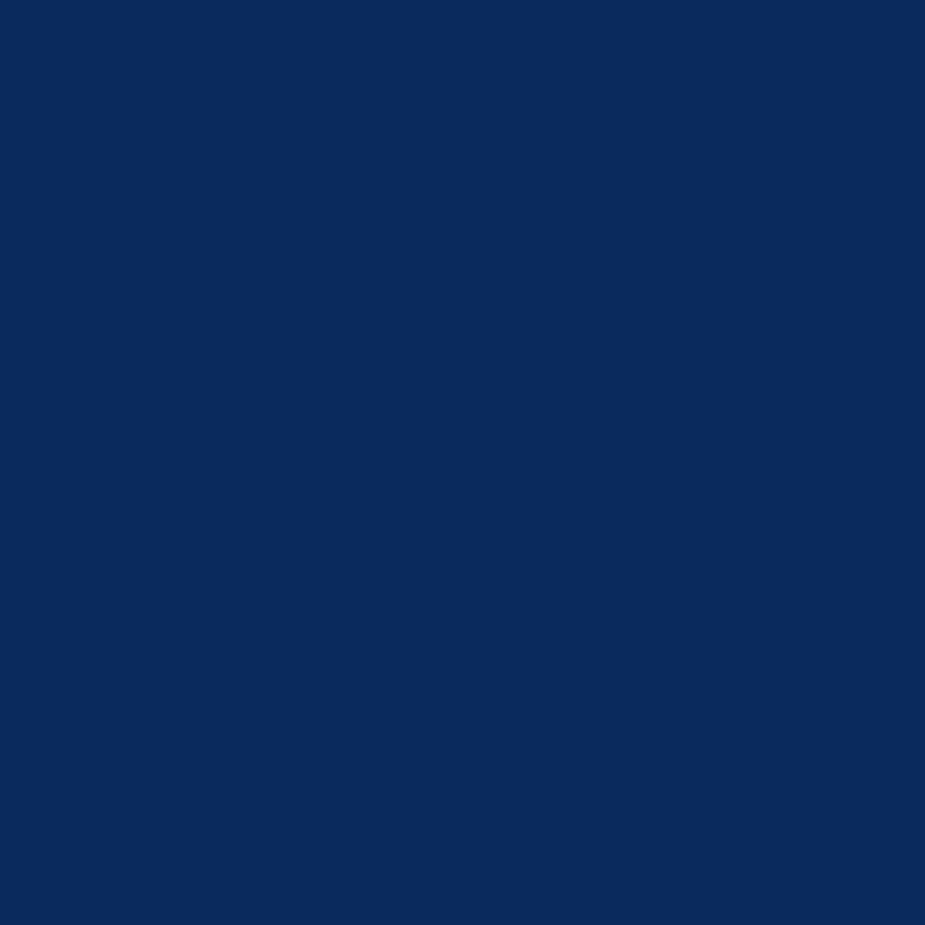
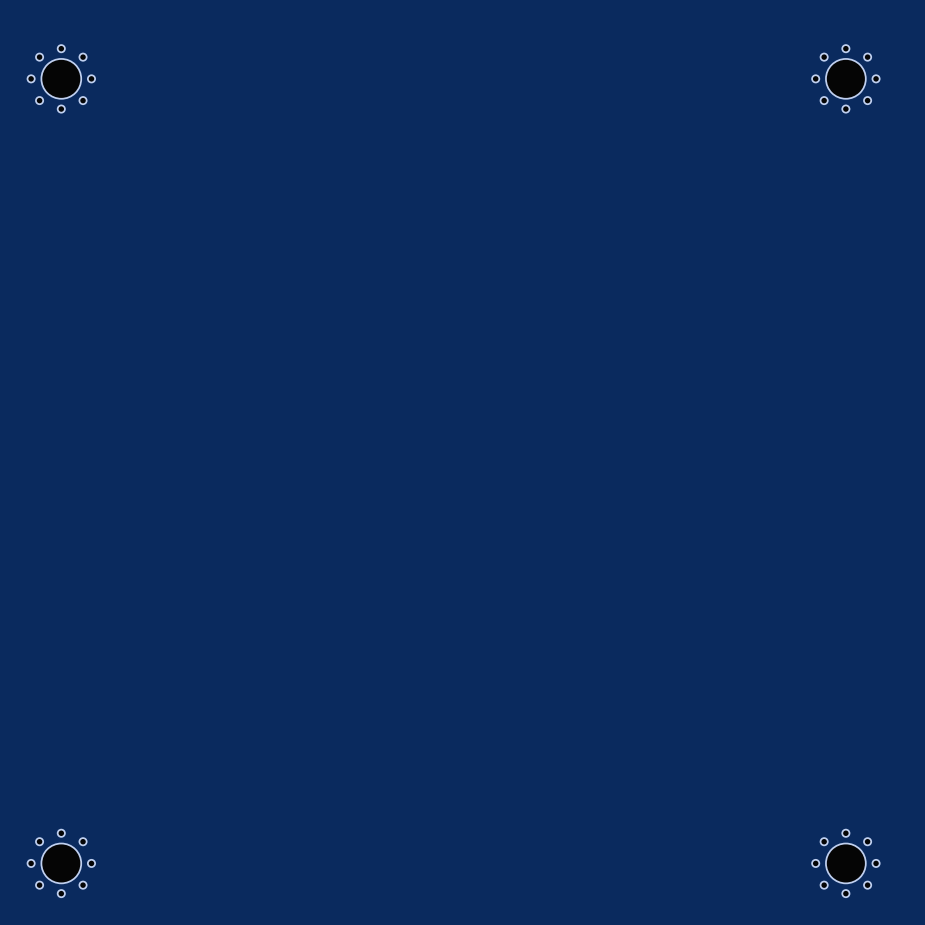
part: none -> (61, 78)
part: none -> (845, 78)
part: none -> (61, 863)
part: none -> (845, 863)

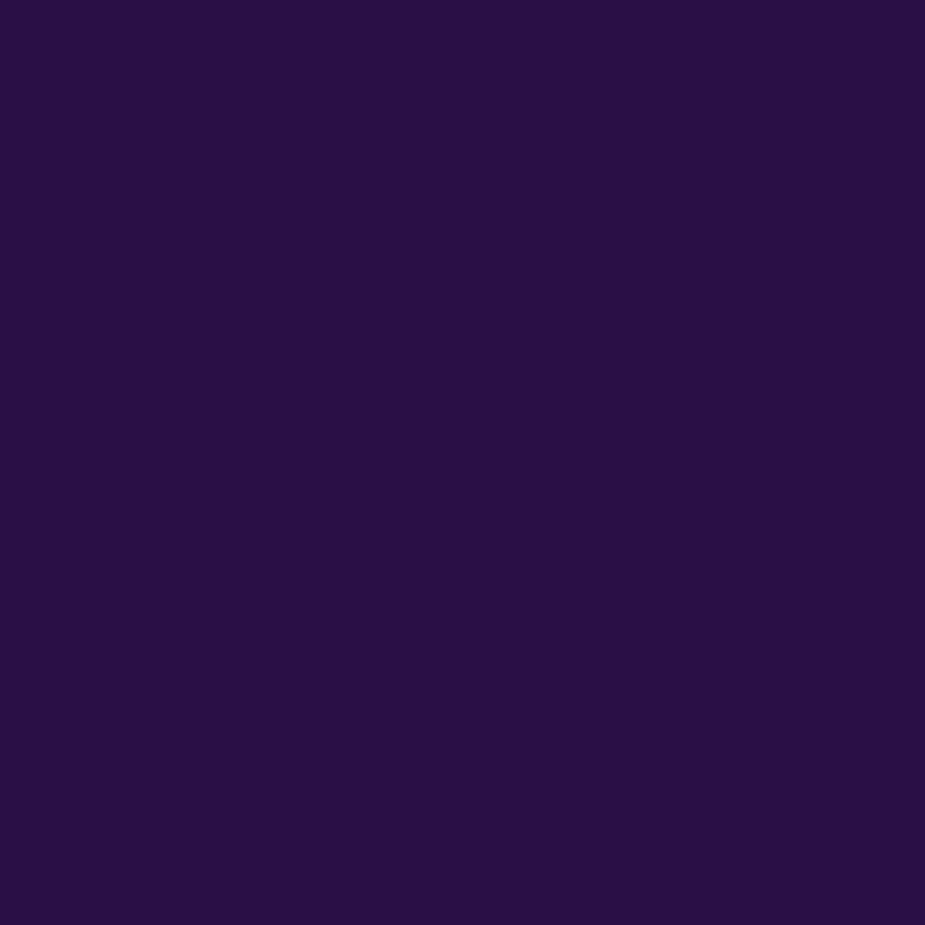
part: (61, 78) -> none
part: (845, 78) -> none
part: (61, 863) -> none
part: (845, 863) -> none

